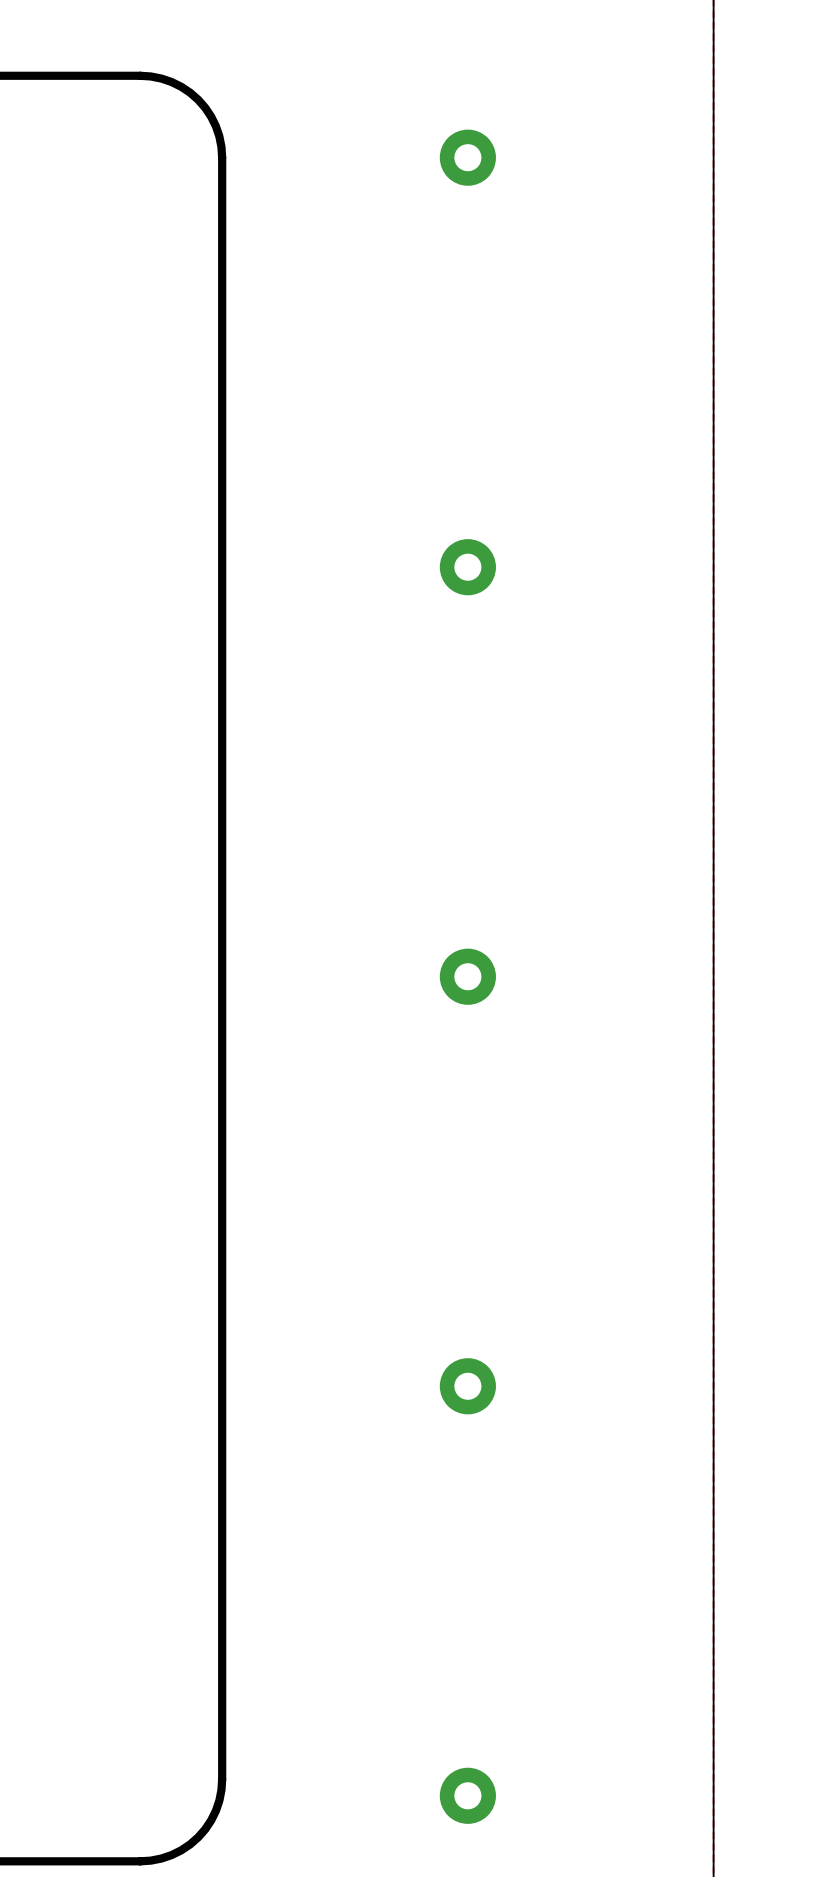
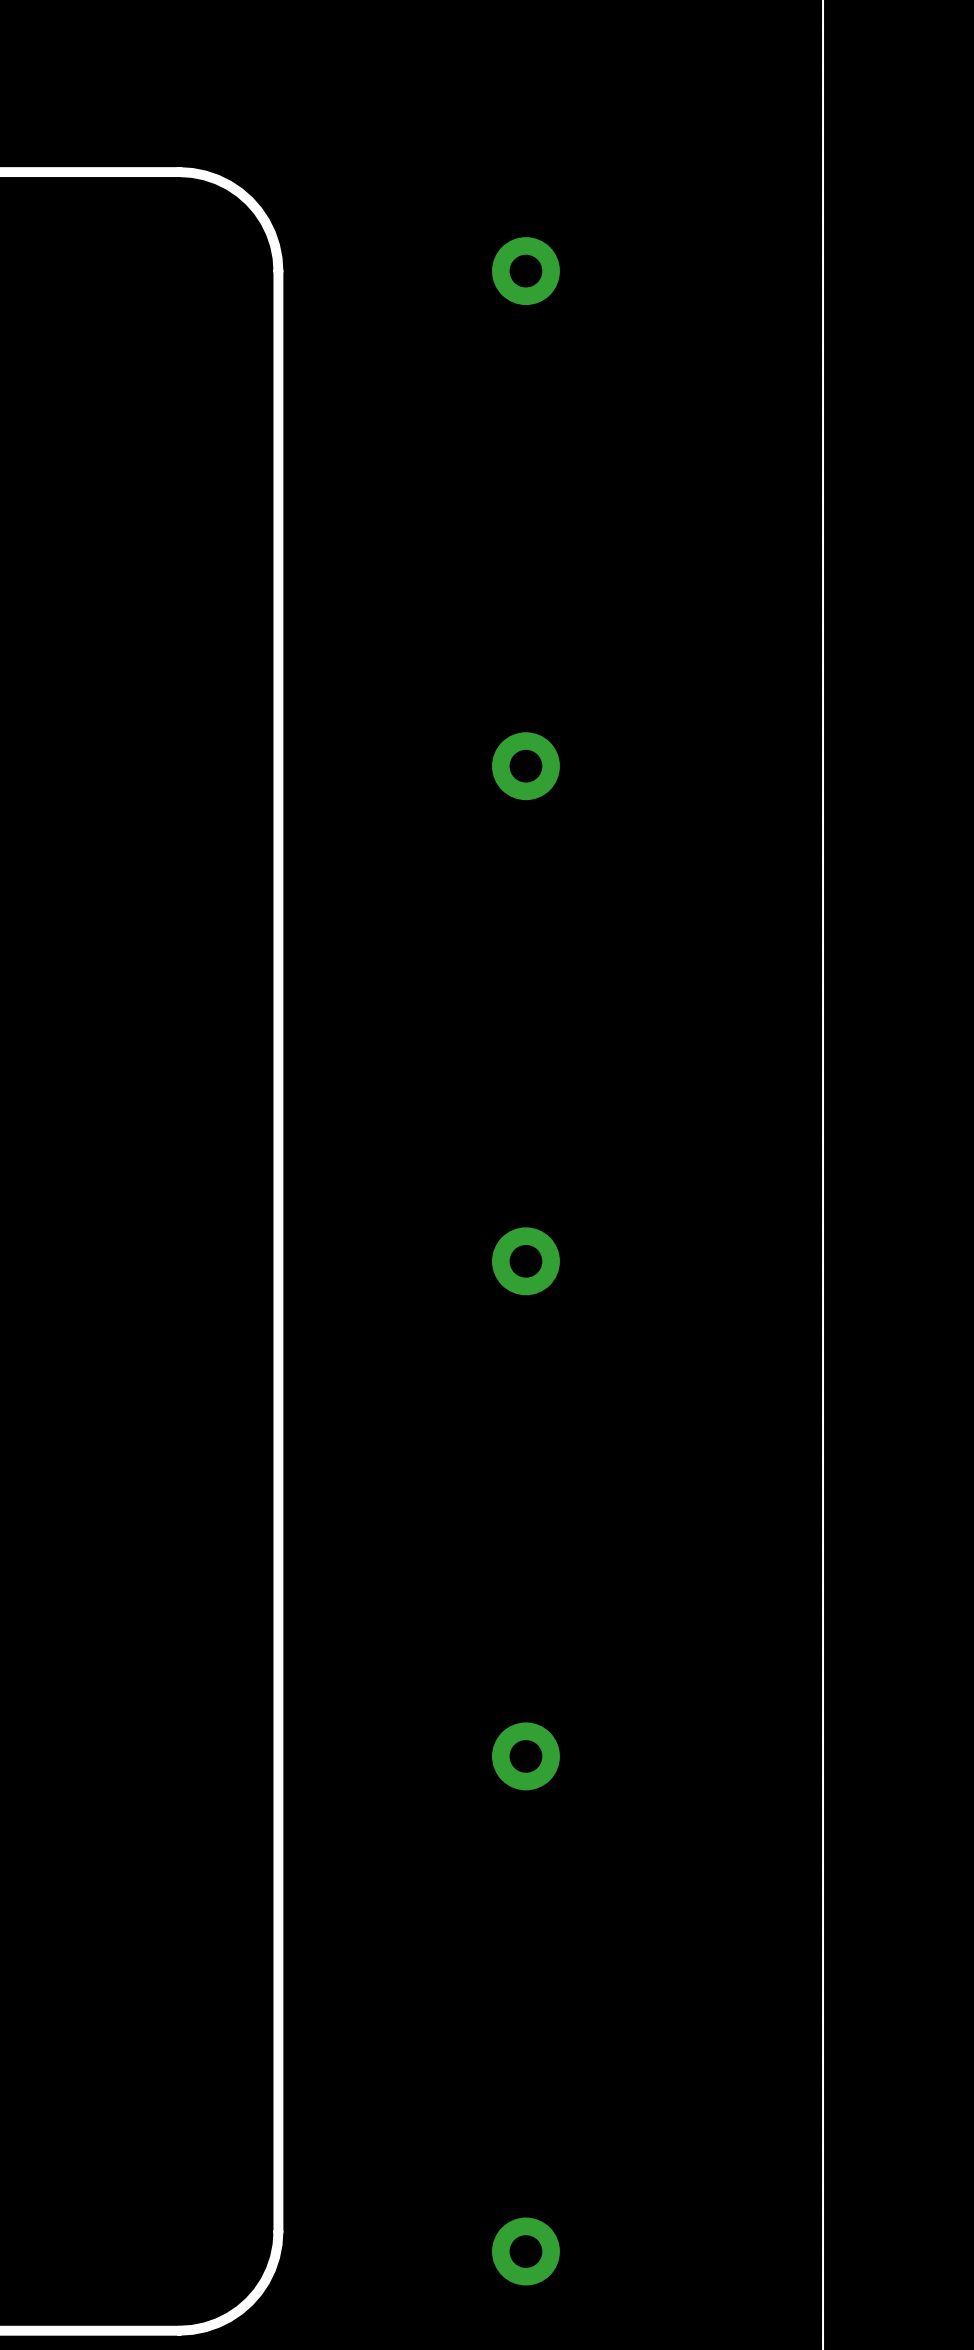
board edge: (140, 75) (171, 82) (198, 99) (215, 126) (222, 157) (222, 1779) (215, 1810) (198, 1837) (171, 1855) (140, 1861) -> (129, 172) (192, 172) (217, 179) (228, 185) (249, 201) (265, 221) (275, 245) (278, 271) (277, 2244) (270, 2269) (257, 2292) (239, 2310) (228, 2317) (217, 2323) (192, 2329) (129, 2330)

